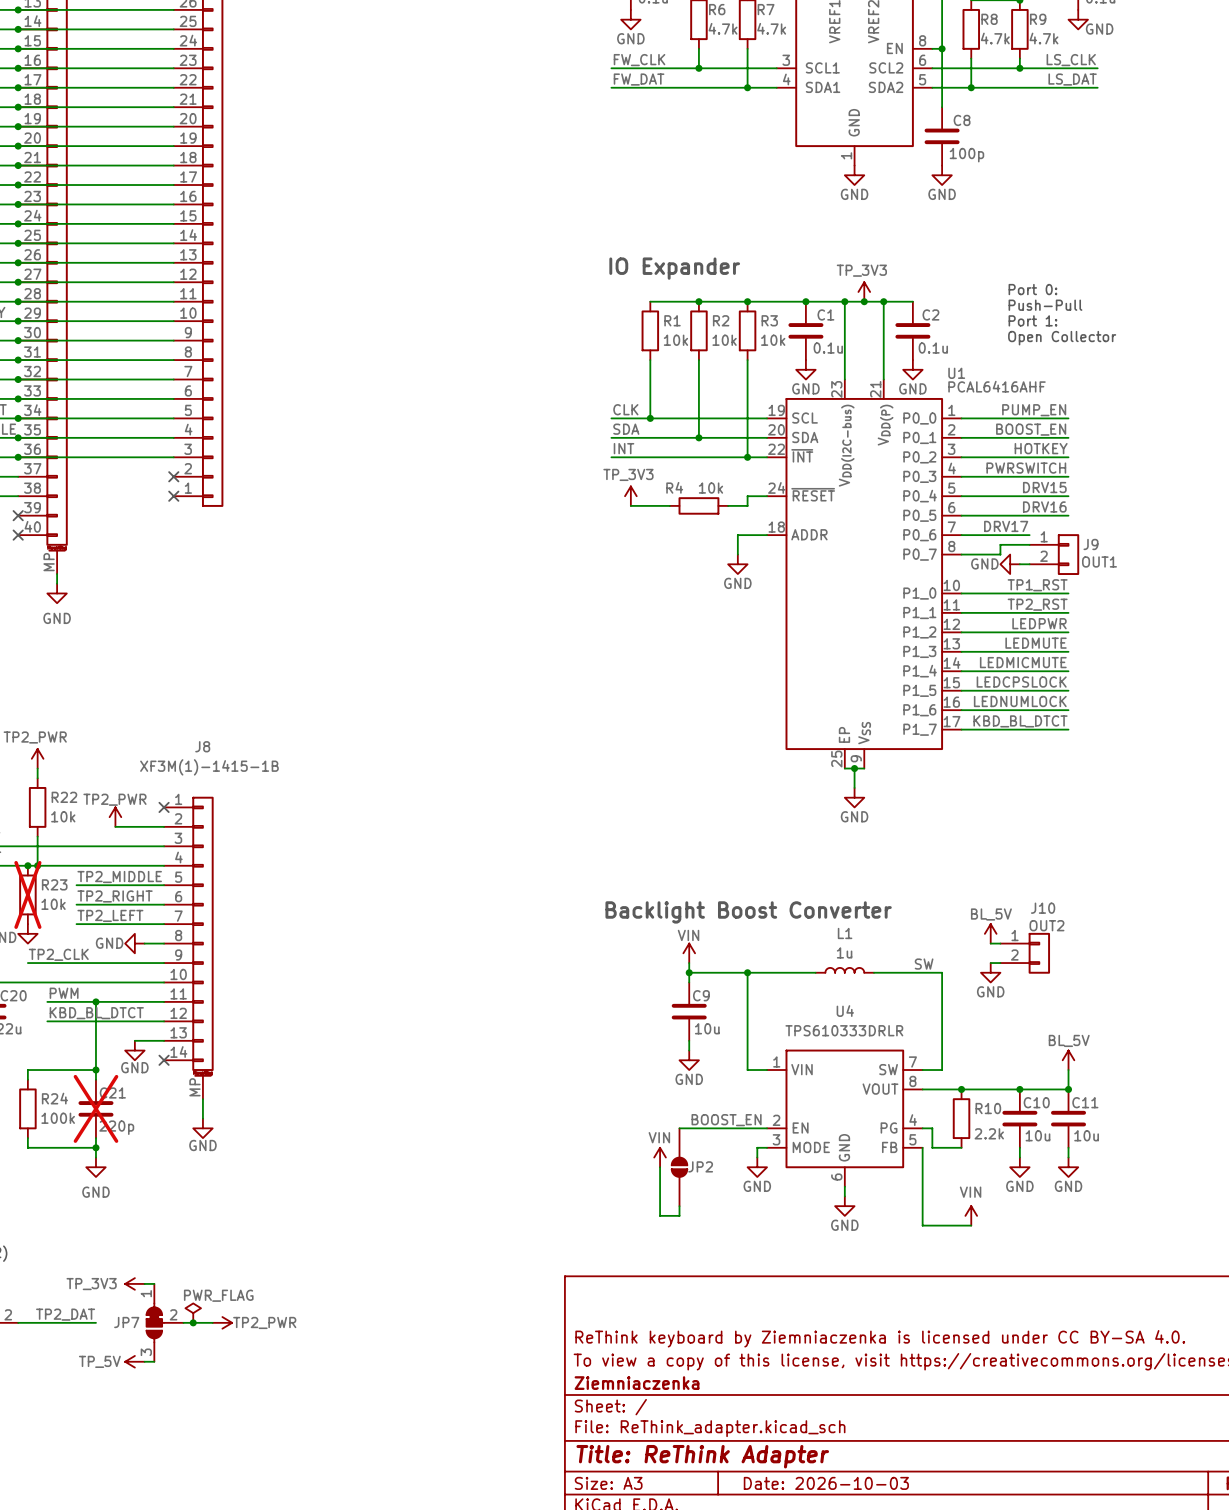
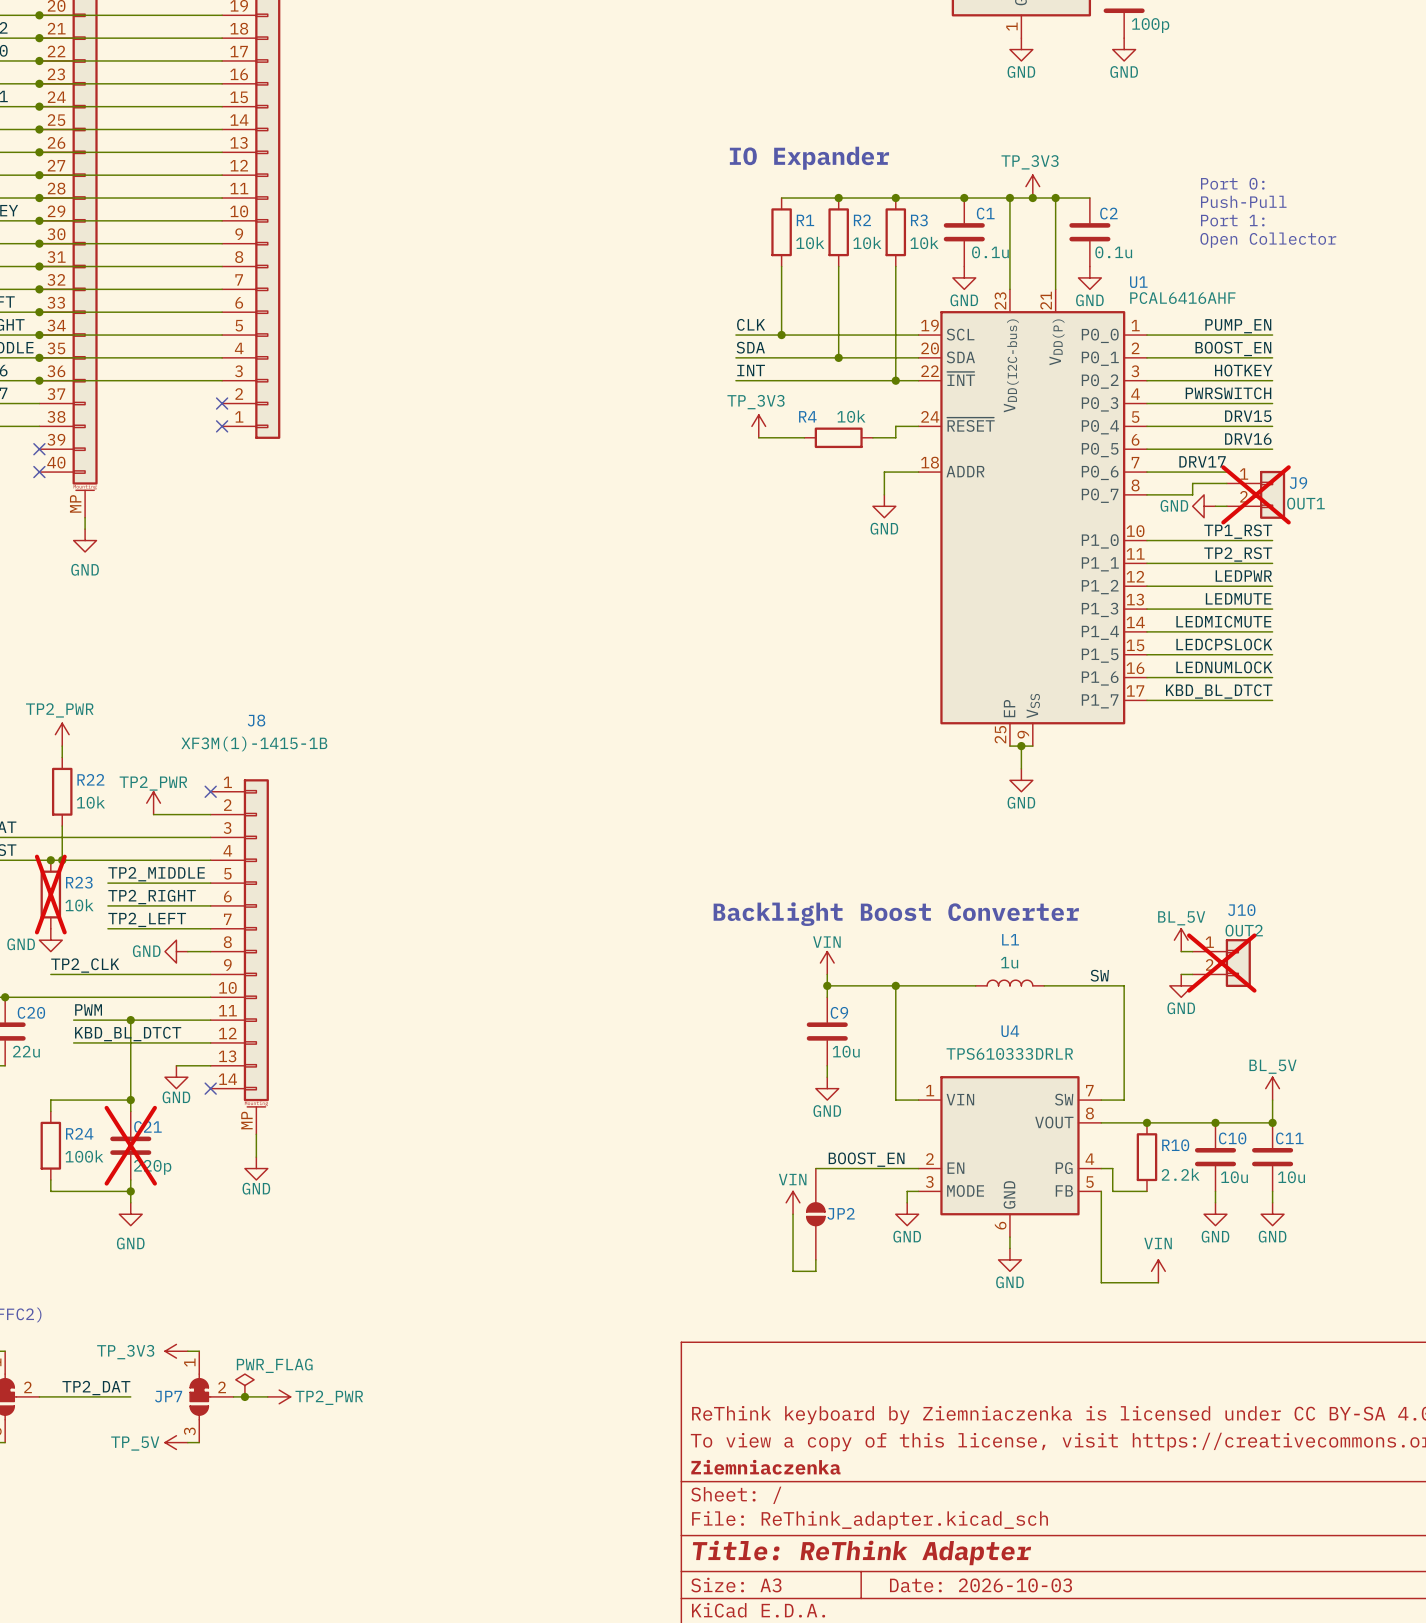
J9 do-not-place cross: none -> (1256, 494)
J10 do-not-place cross: none -> (1221, 963)

